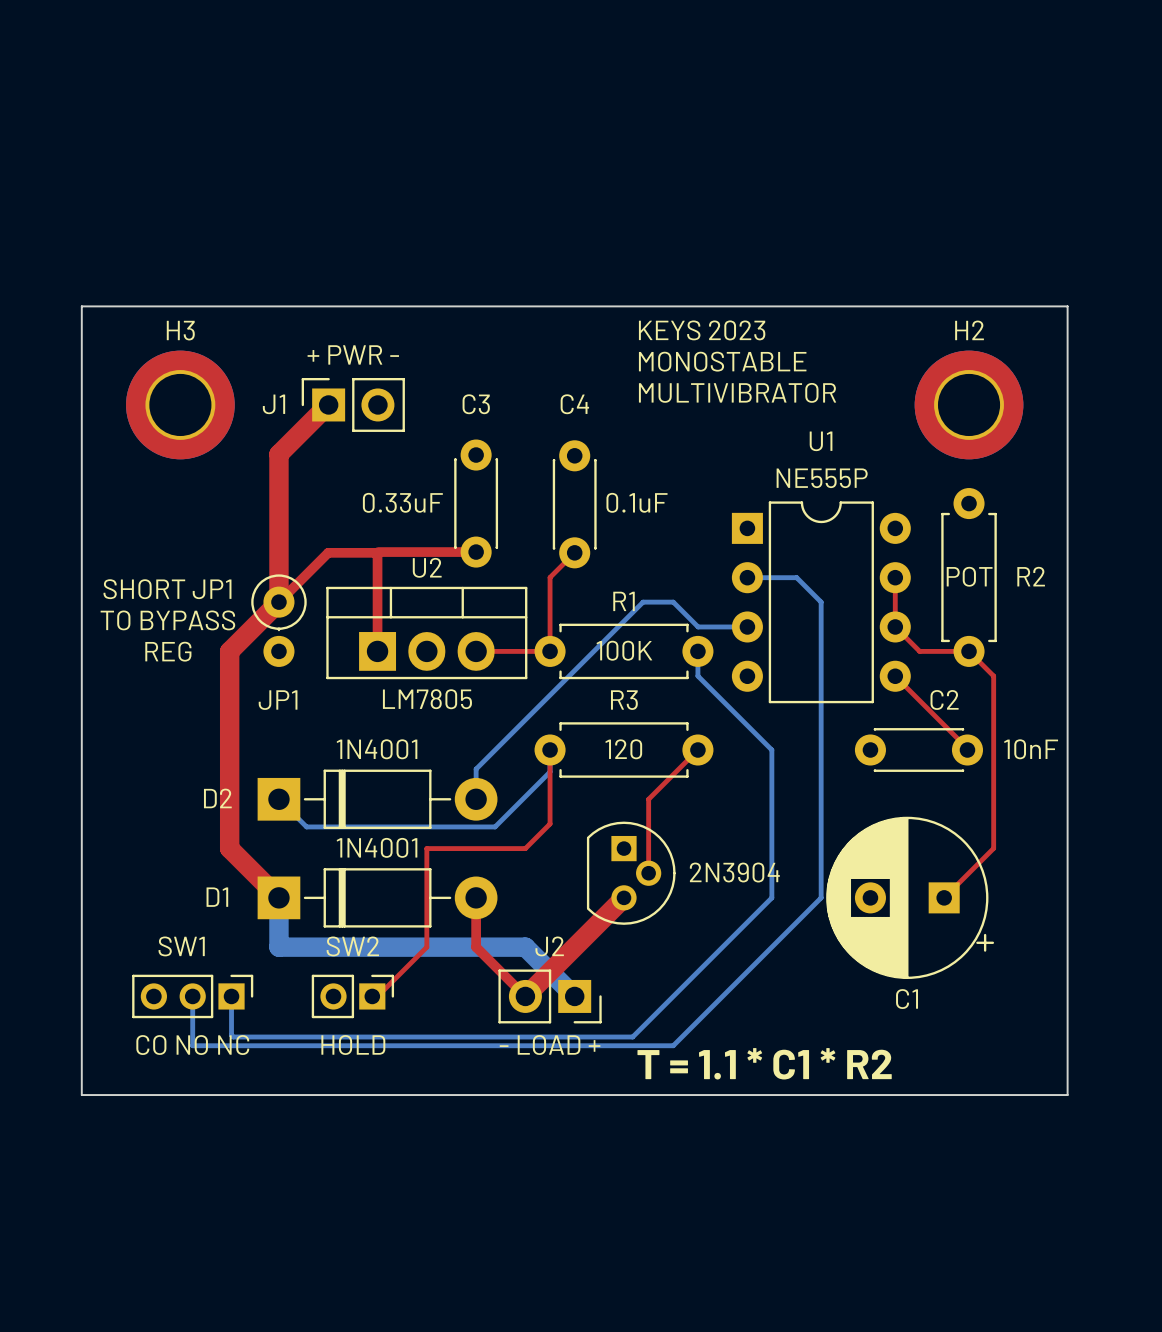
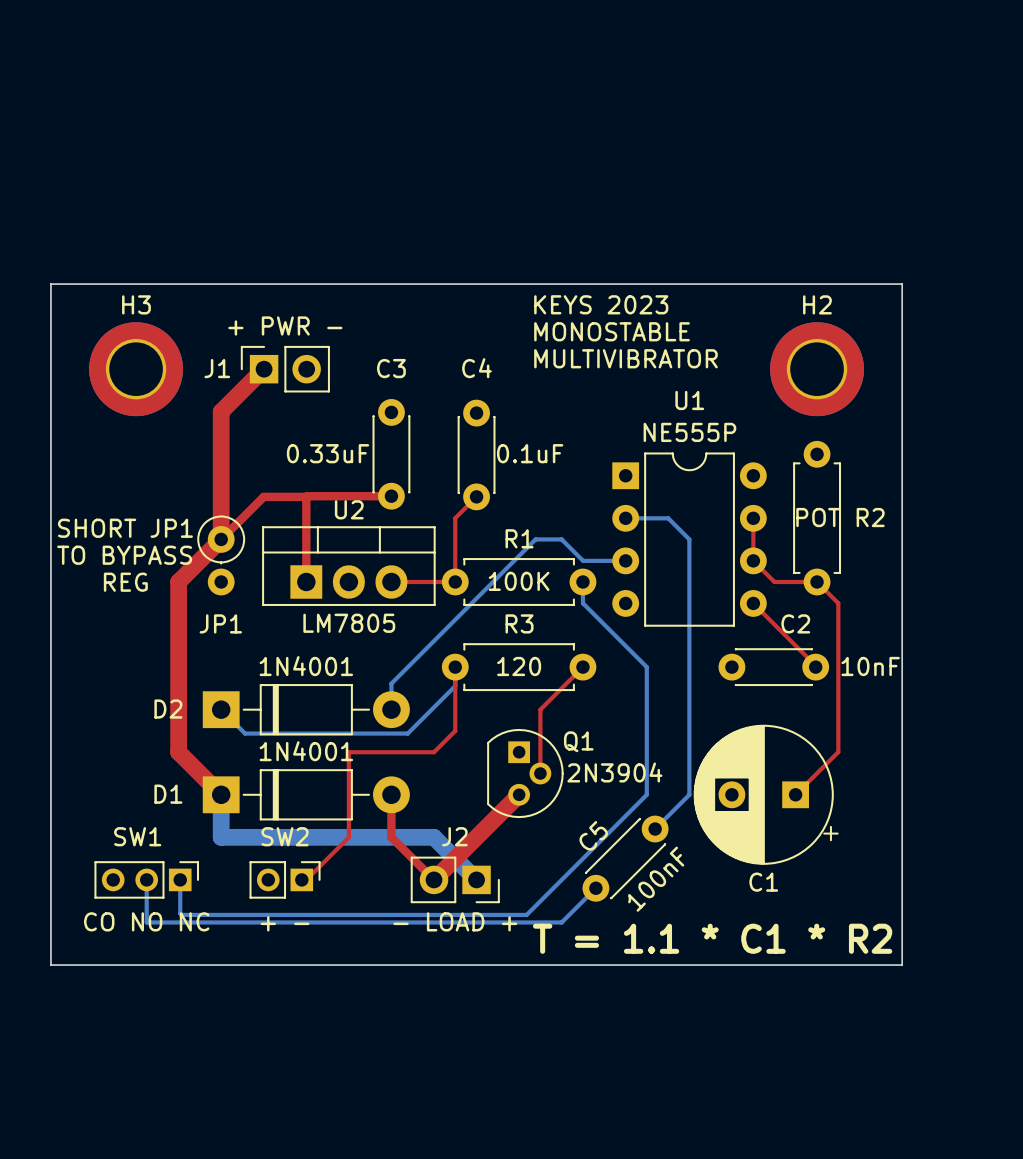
Q1 name: none -> Q1 (578, 741)
bottom track: (781, 937) (712, 1006) -> none
C5: none -> 100nF (625, 858)
SW2 value: HOLD (353, 1045) -> + - (285, 923)

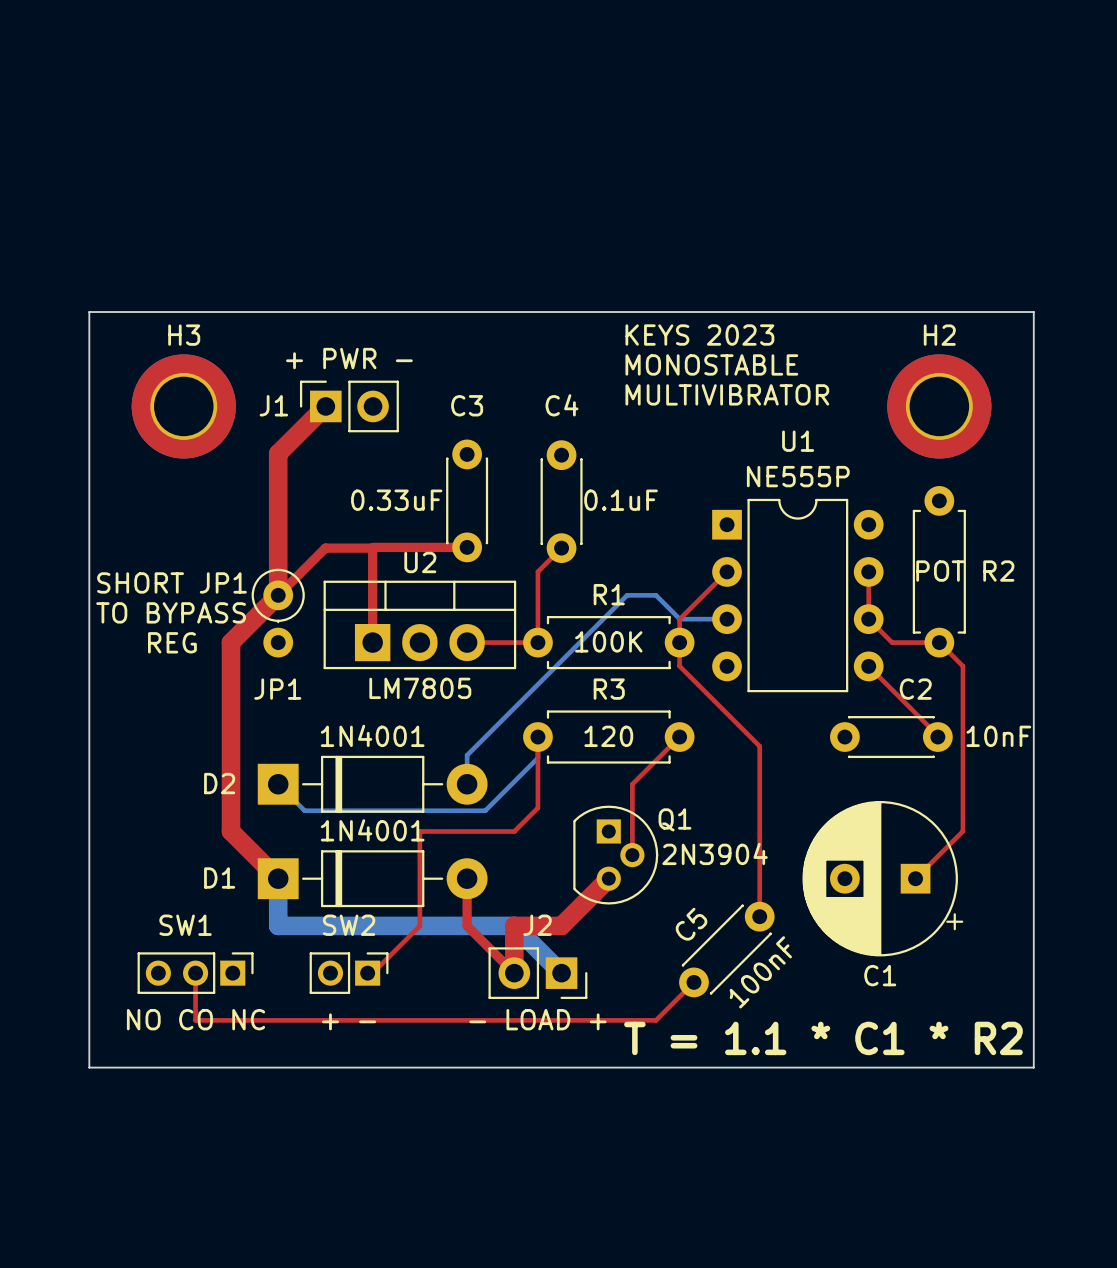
top track: none -> (727, 571) (679, 619) (679, 666) (759, 746) (759, 916)
bottom track: (625, 518) (668, 518) (689, 539) (689, 794) (655, 829) -> none
bottom track: (582, 581) (582, 603) (646, 667) (646, 794) (526, 914) (181, 914) (180, 879) -> none
top track: (476, 837) (434, 879) -> (561, 925) (514, 925) (514, 973)
top track: none -> (195, 973) (195, 1020) (656, 1020) (693, 982)
bottom track: (146, 879) (146, 922) (561, 922) (595, 888) -> none
SW1 value: CO NO NC (146, 921) -> NO CO NC (196, 1019)

